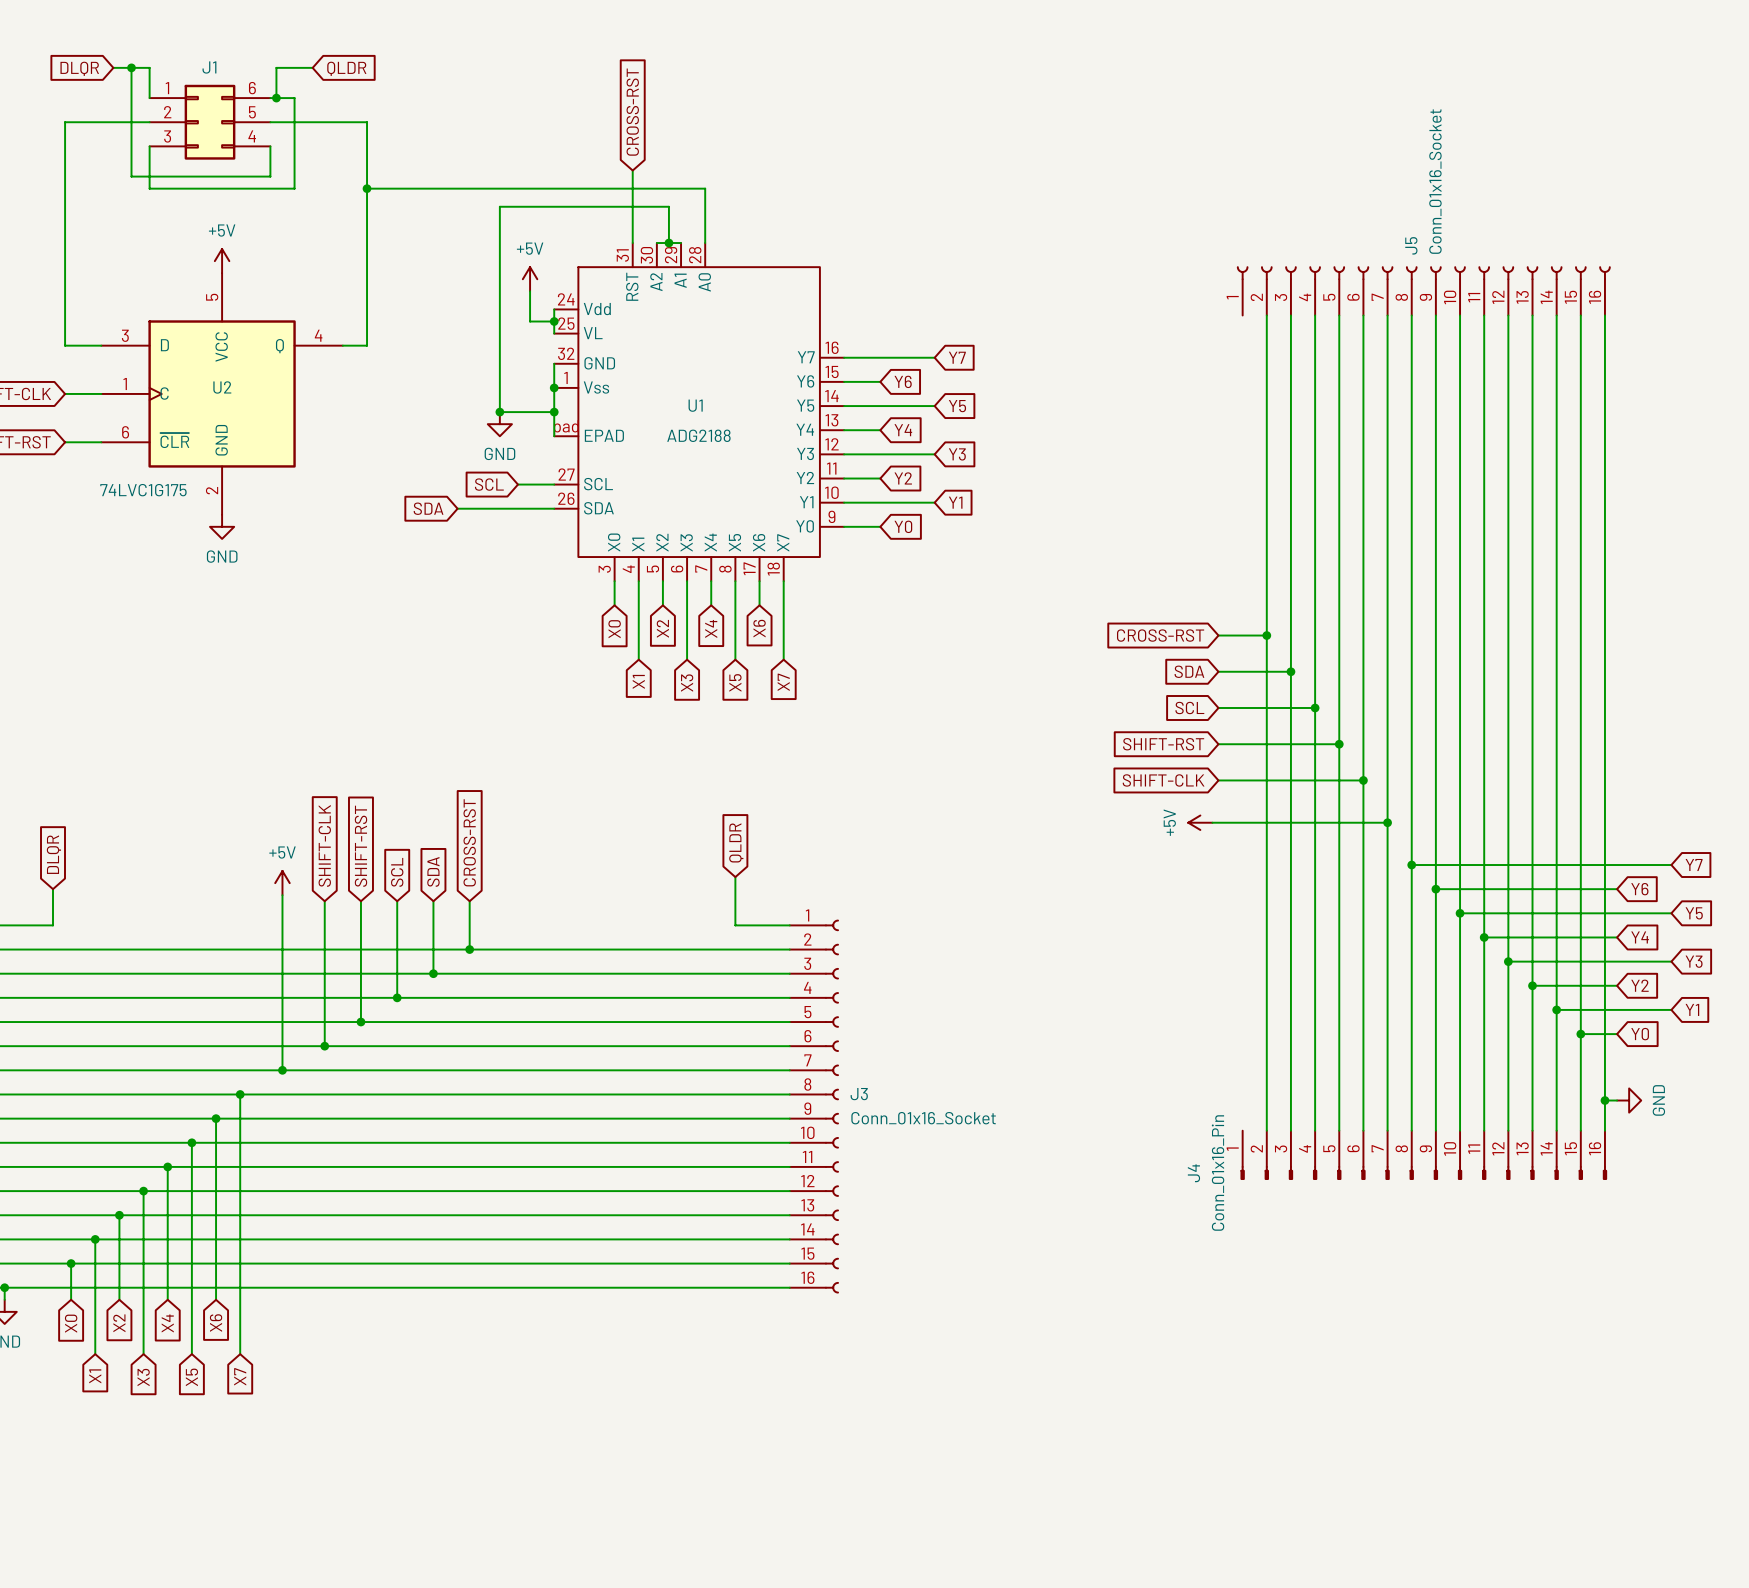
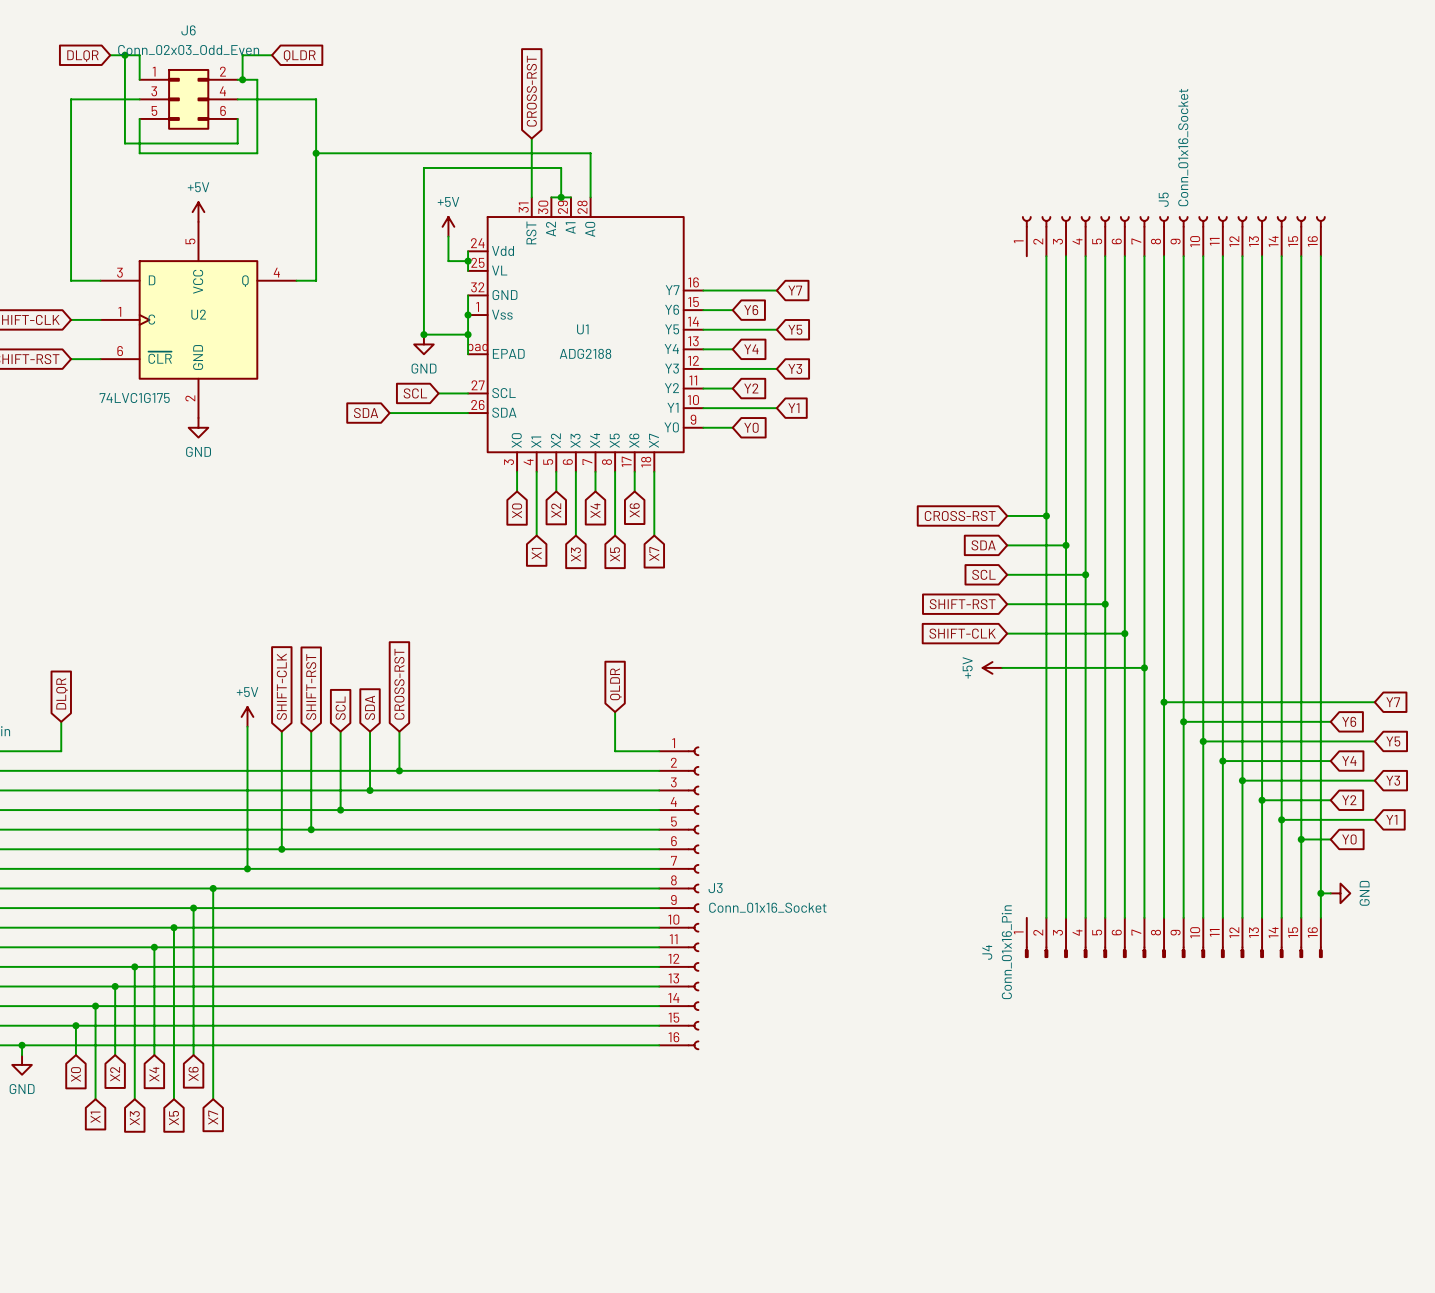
J1 value: none -> Conn_02x03_Odd_Even (188, 50)
J1 name: J1 (209, 67) -> J6 (188, 30)
J1 pin number: 6 (252, 88) -> 2 (222, 71)
J1 pin number: 2 (167, 112) -> 3 (154, 91)
J1 pin number: 5 (252, 112) -> 4 (222, 91)
J1 pin number: 3 (167, 136) -> 5 (154, 110)
J1 pin number: 4 (252, 136) -> 6 (223, 110)

